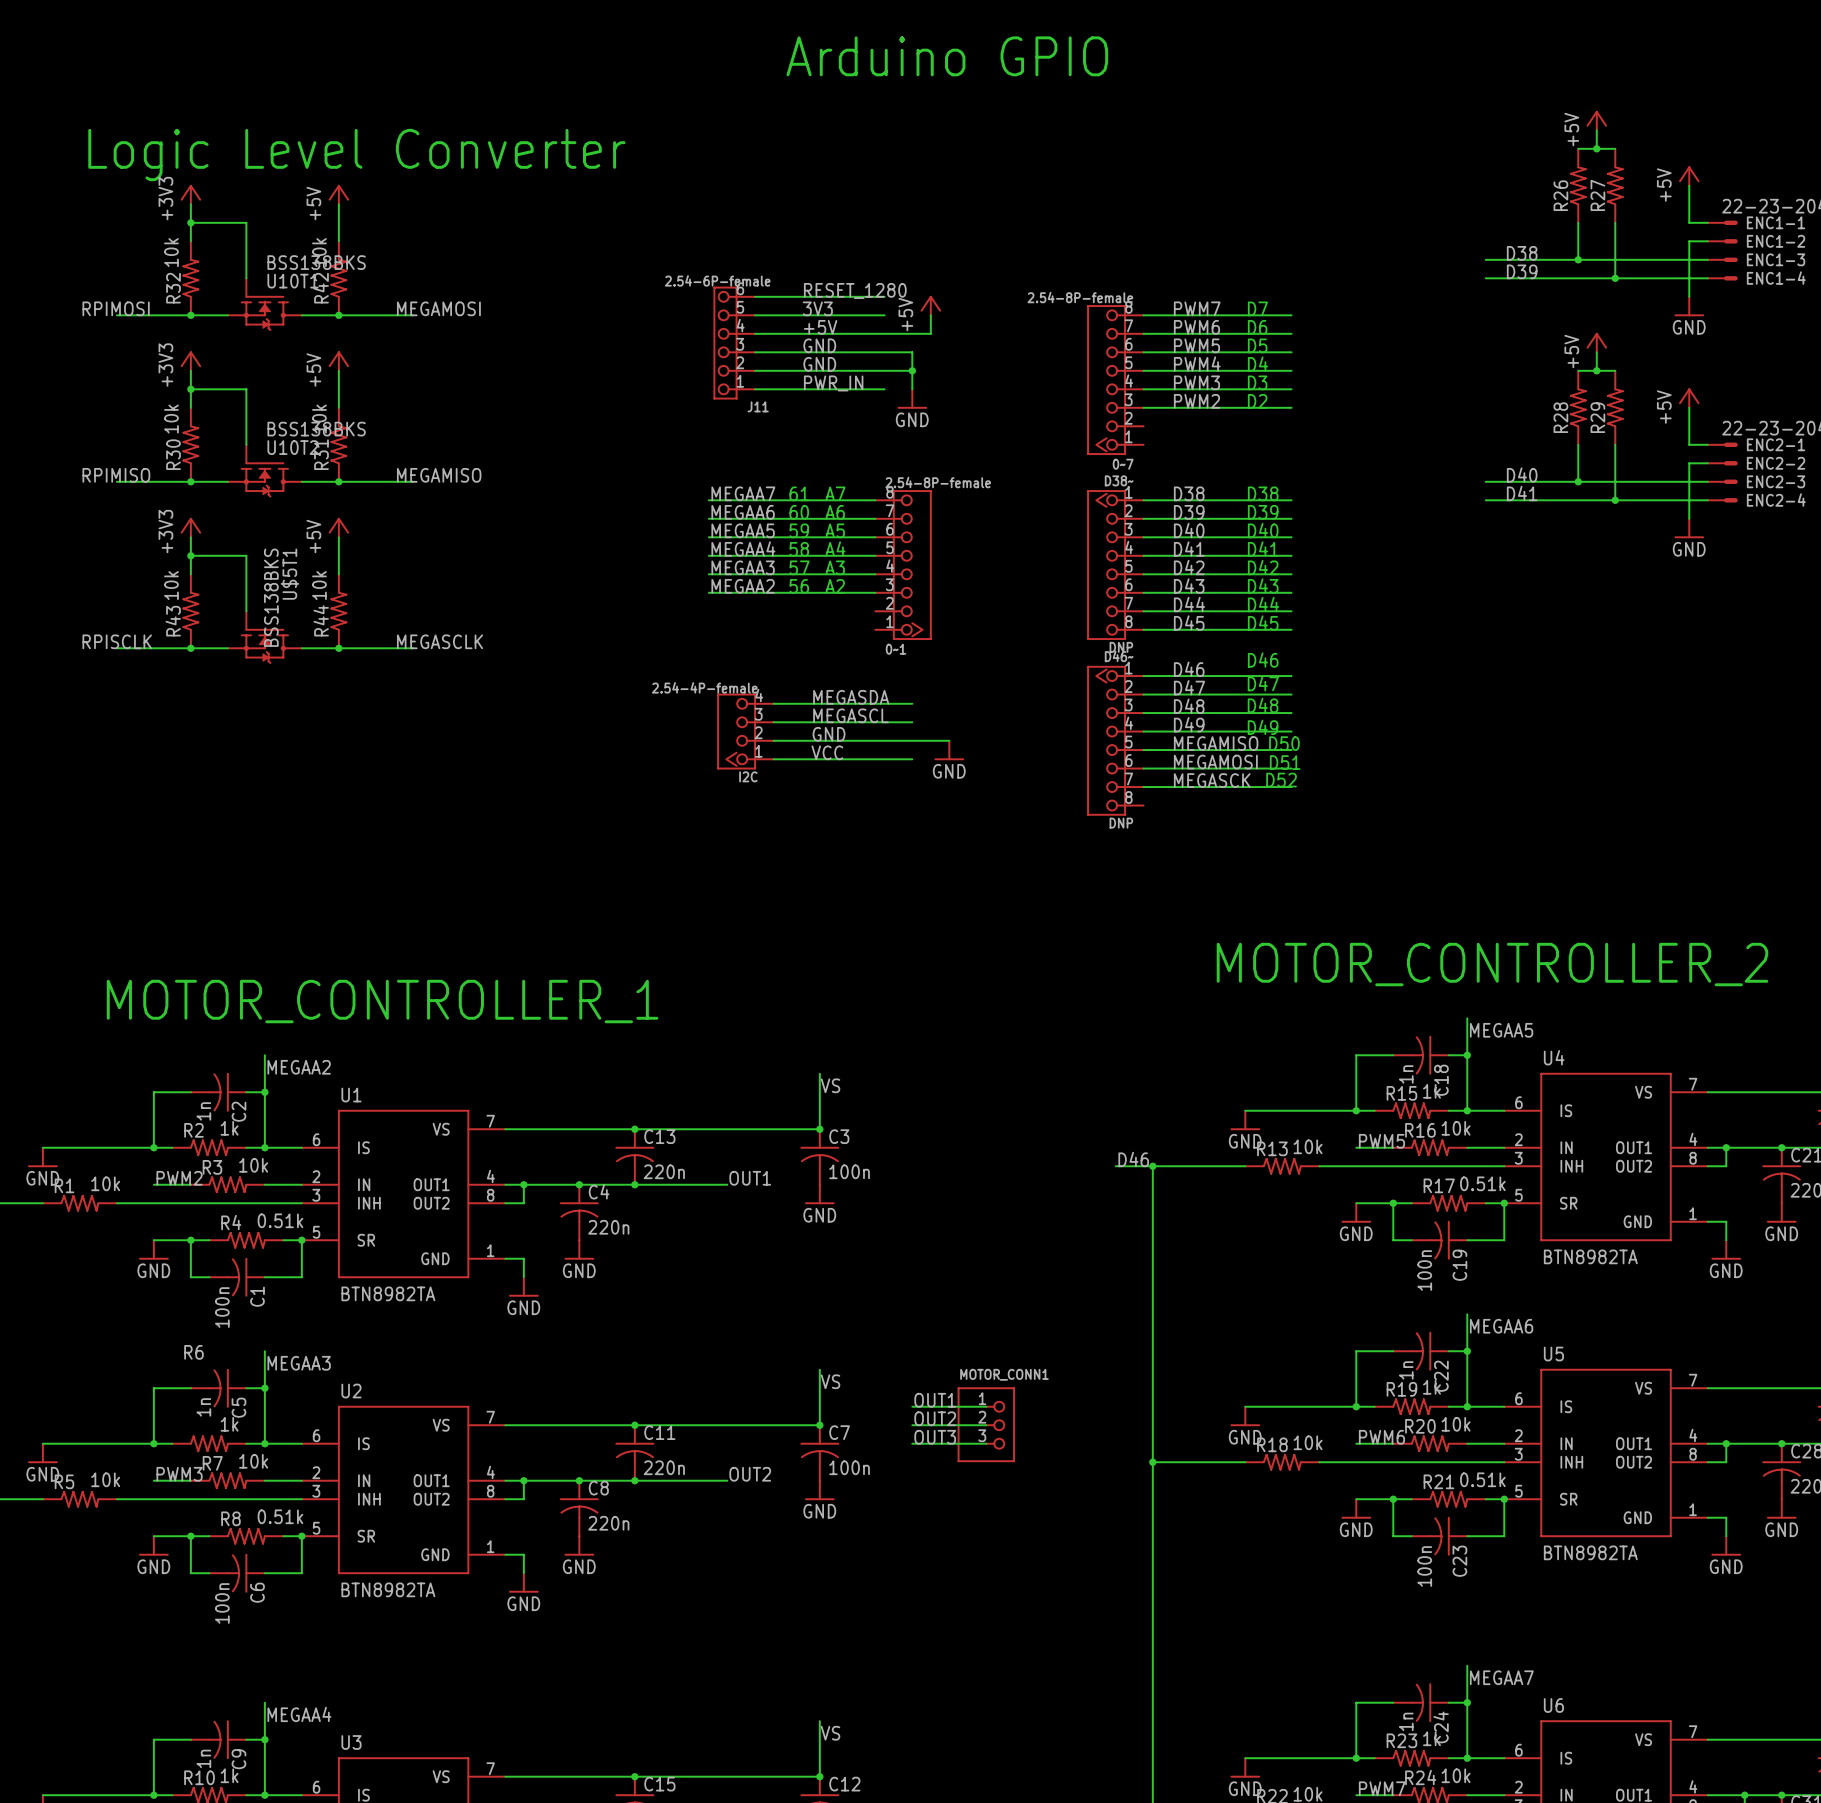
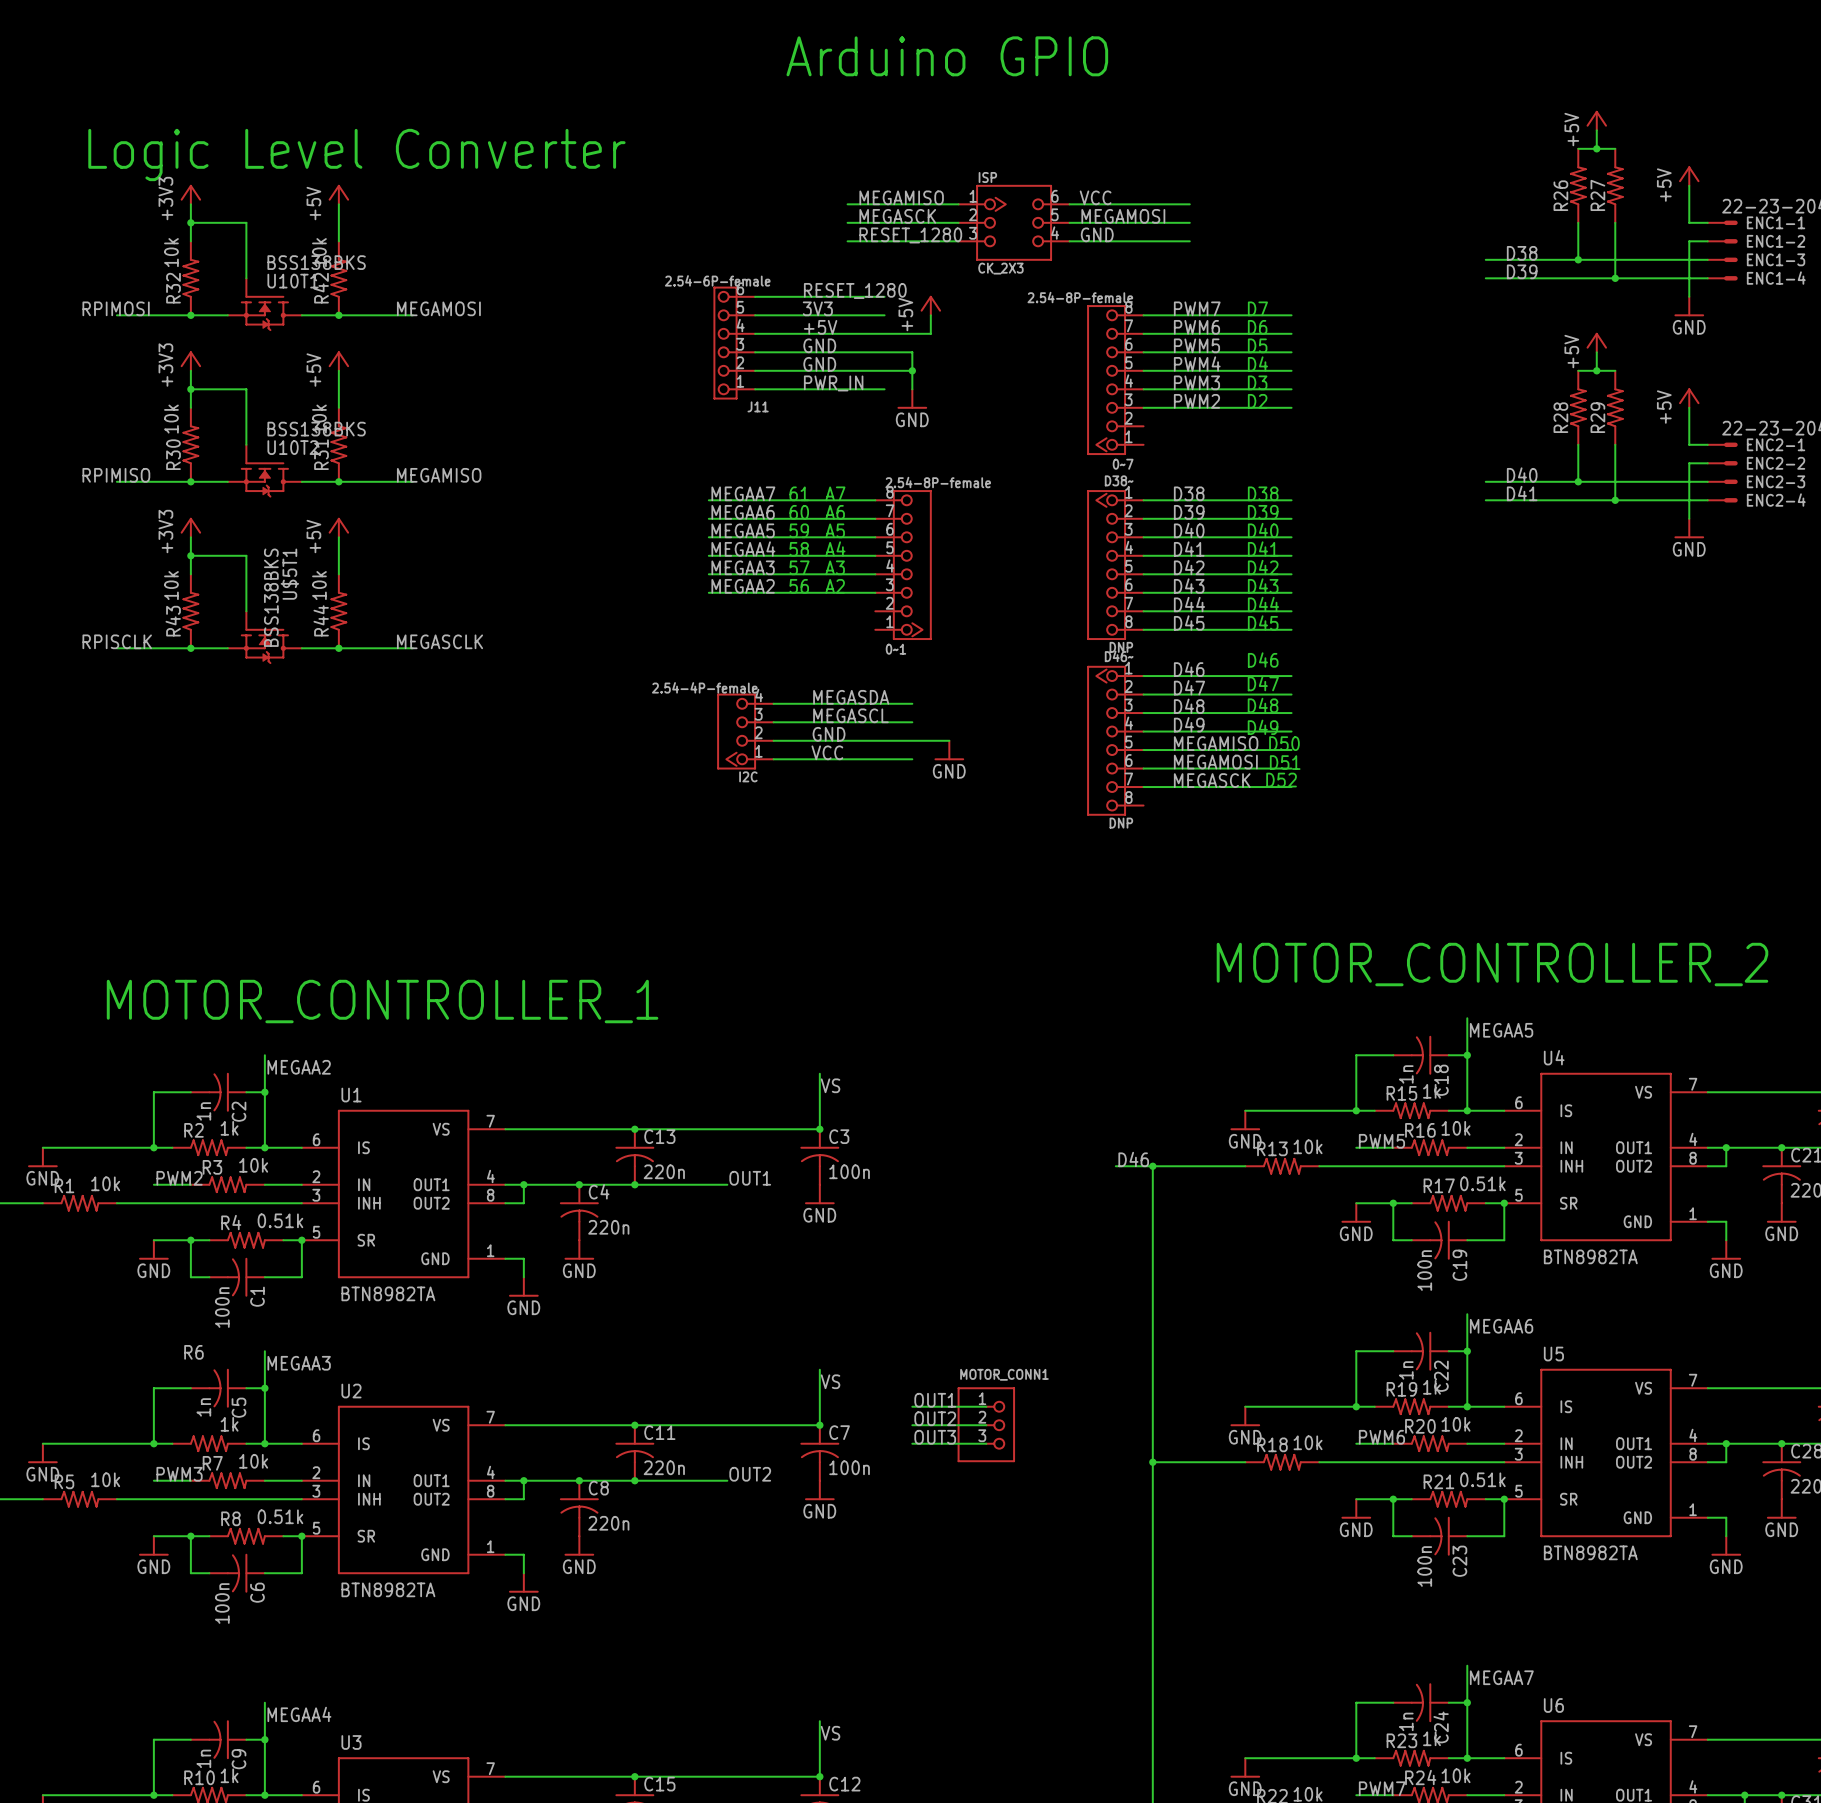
label: none -> MEGAMISO (901, 197)
label: none -> VCC (1095, 197)
wire: none -> (847, 204) (958, 204)
wire: none -> (1069, 204) (1189, 204)
label: none -> MEGASCK (897, 216)
label: none -> MEGAMOSI (1123, 216)
wire: none -> (847, 222) (958, 222)
ISP: none -> CK_2X3 (1014, 222)
wire: none -> (1069, 222) (1189, 222)
label: none -> GND (1097, 234)
label: none -> RESET_1280 (910, 235)
wire: none -> (847, 241) (958, 241)
wire: none -> (1069, 241) (1189, 241)

